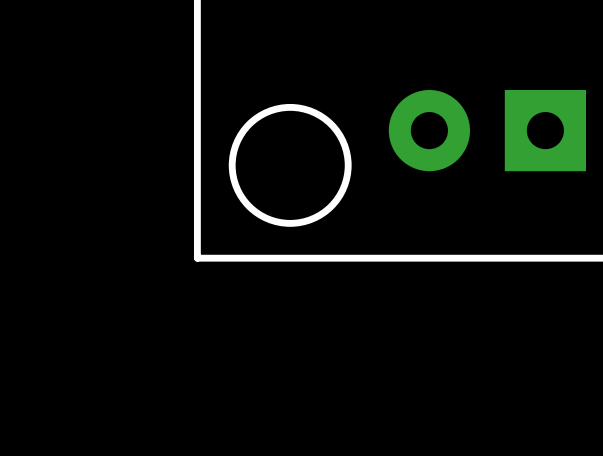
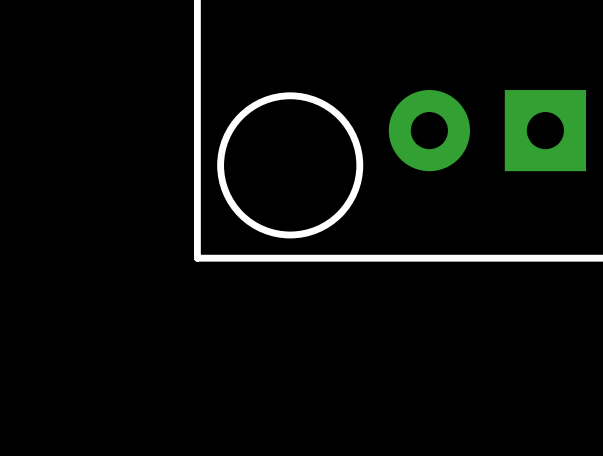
round board edge size: [228, 103, 352, 227] -> [217, 92, 364, 239]

